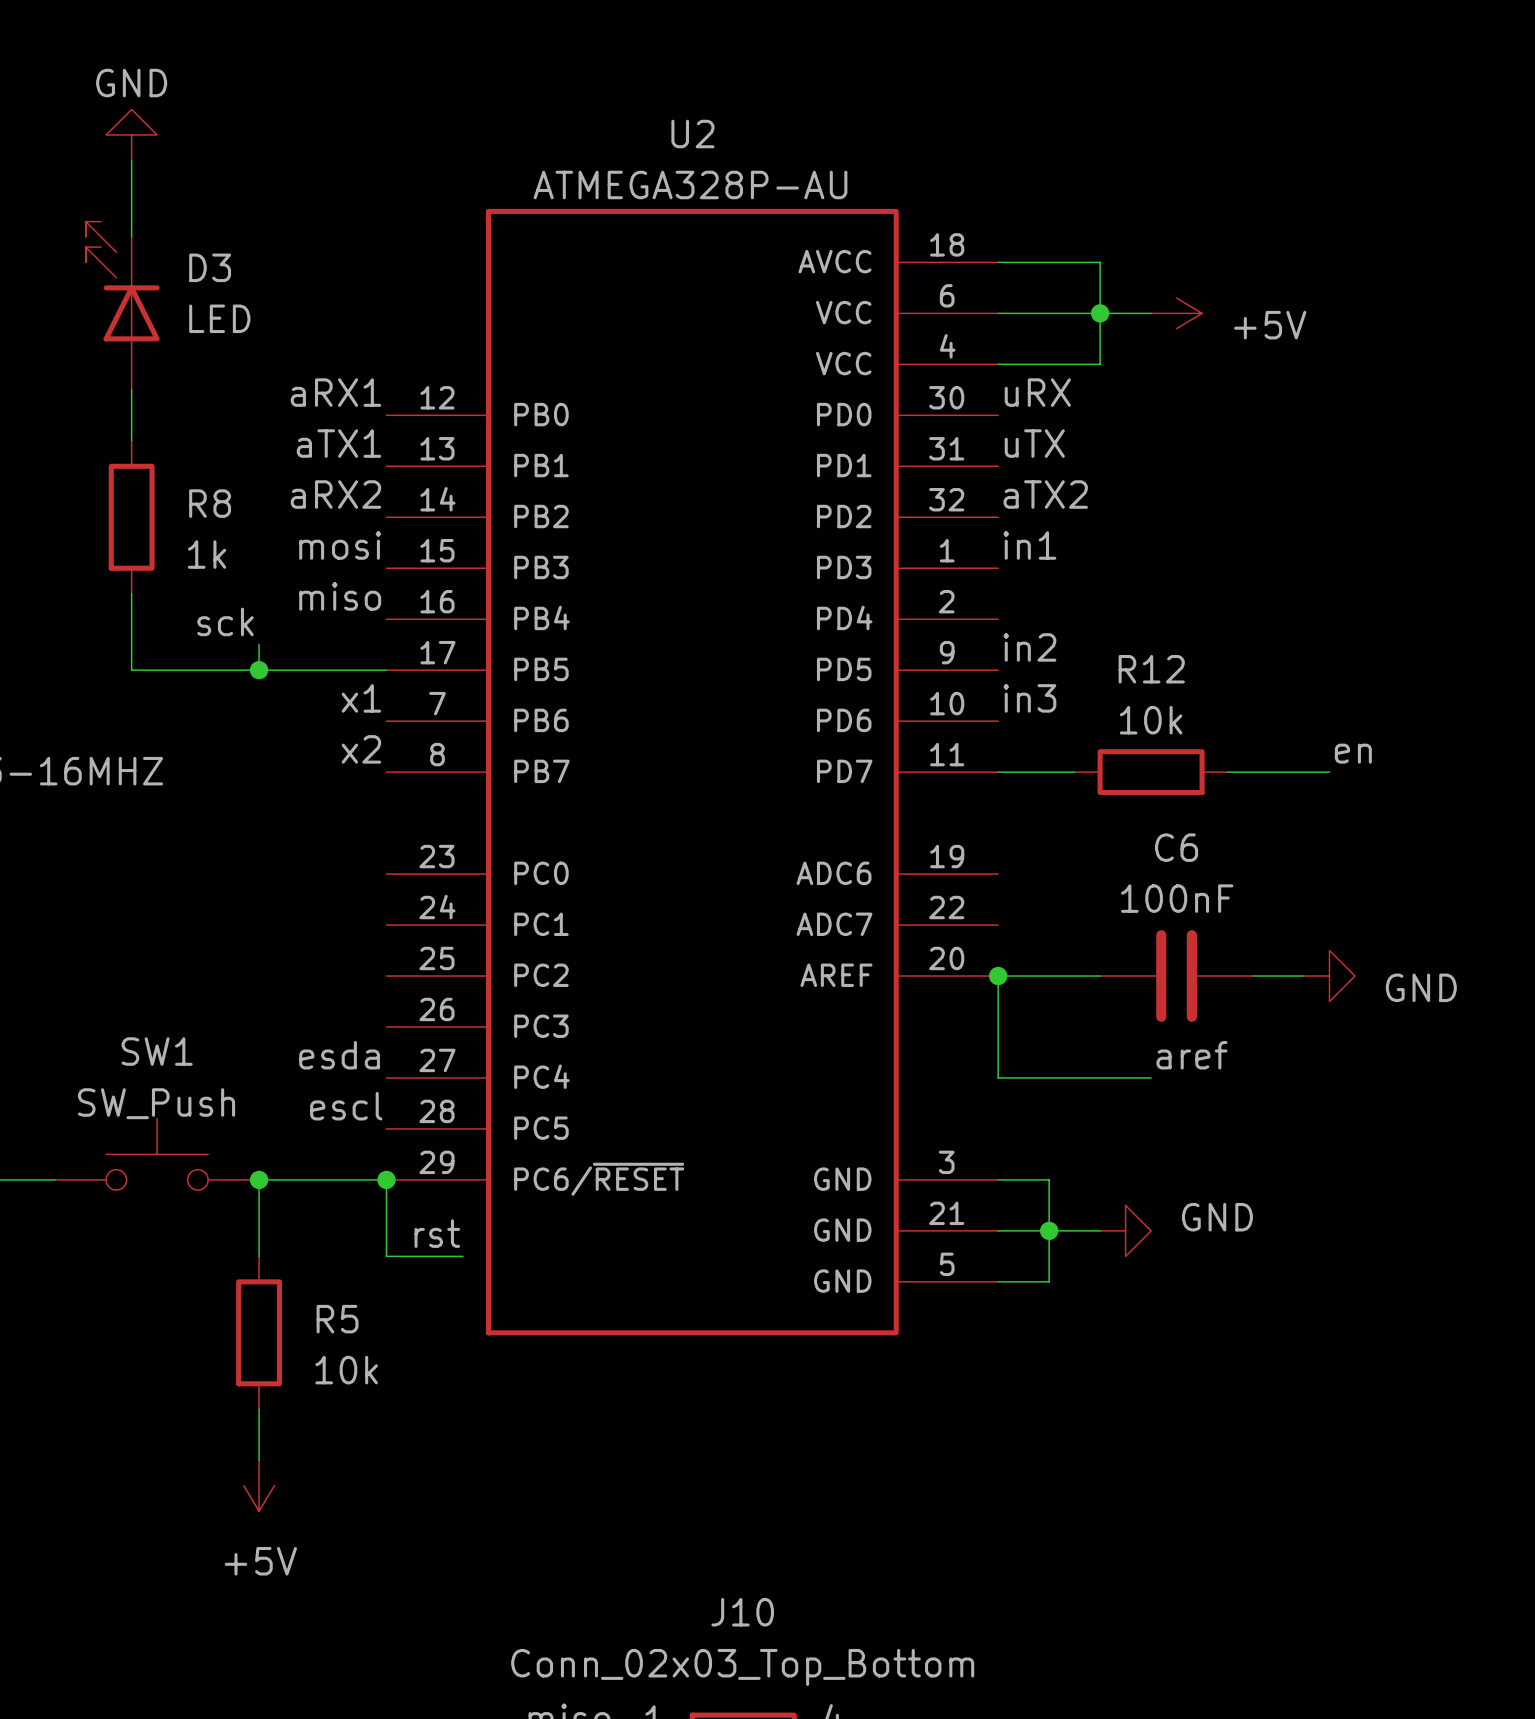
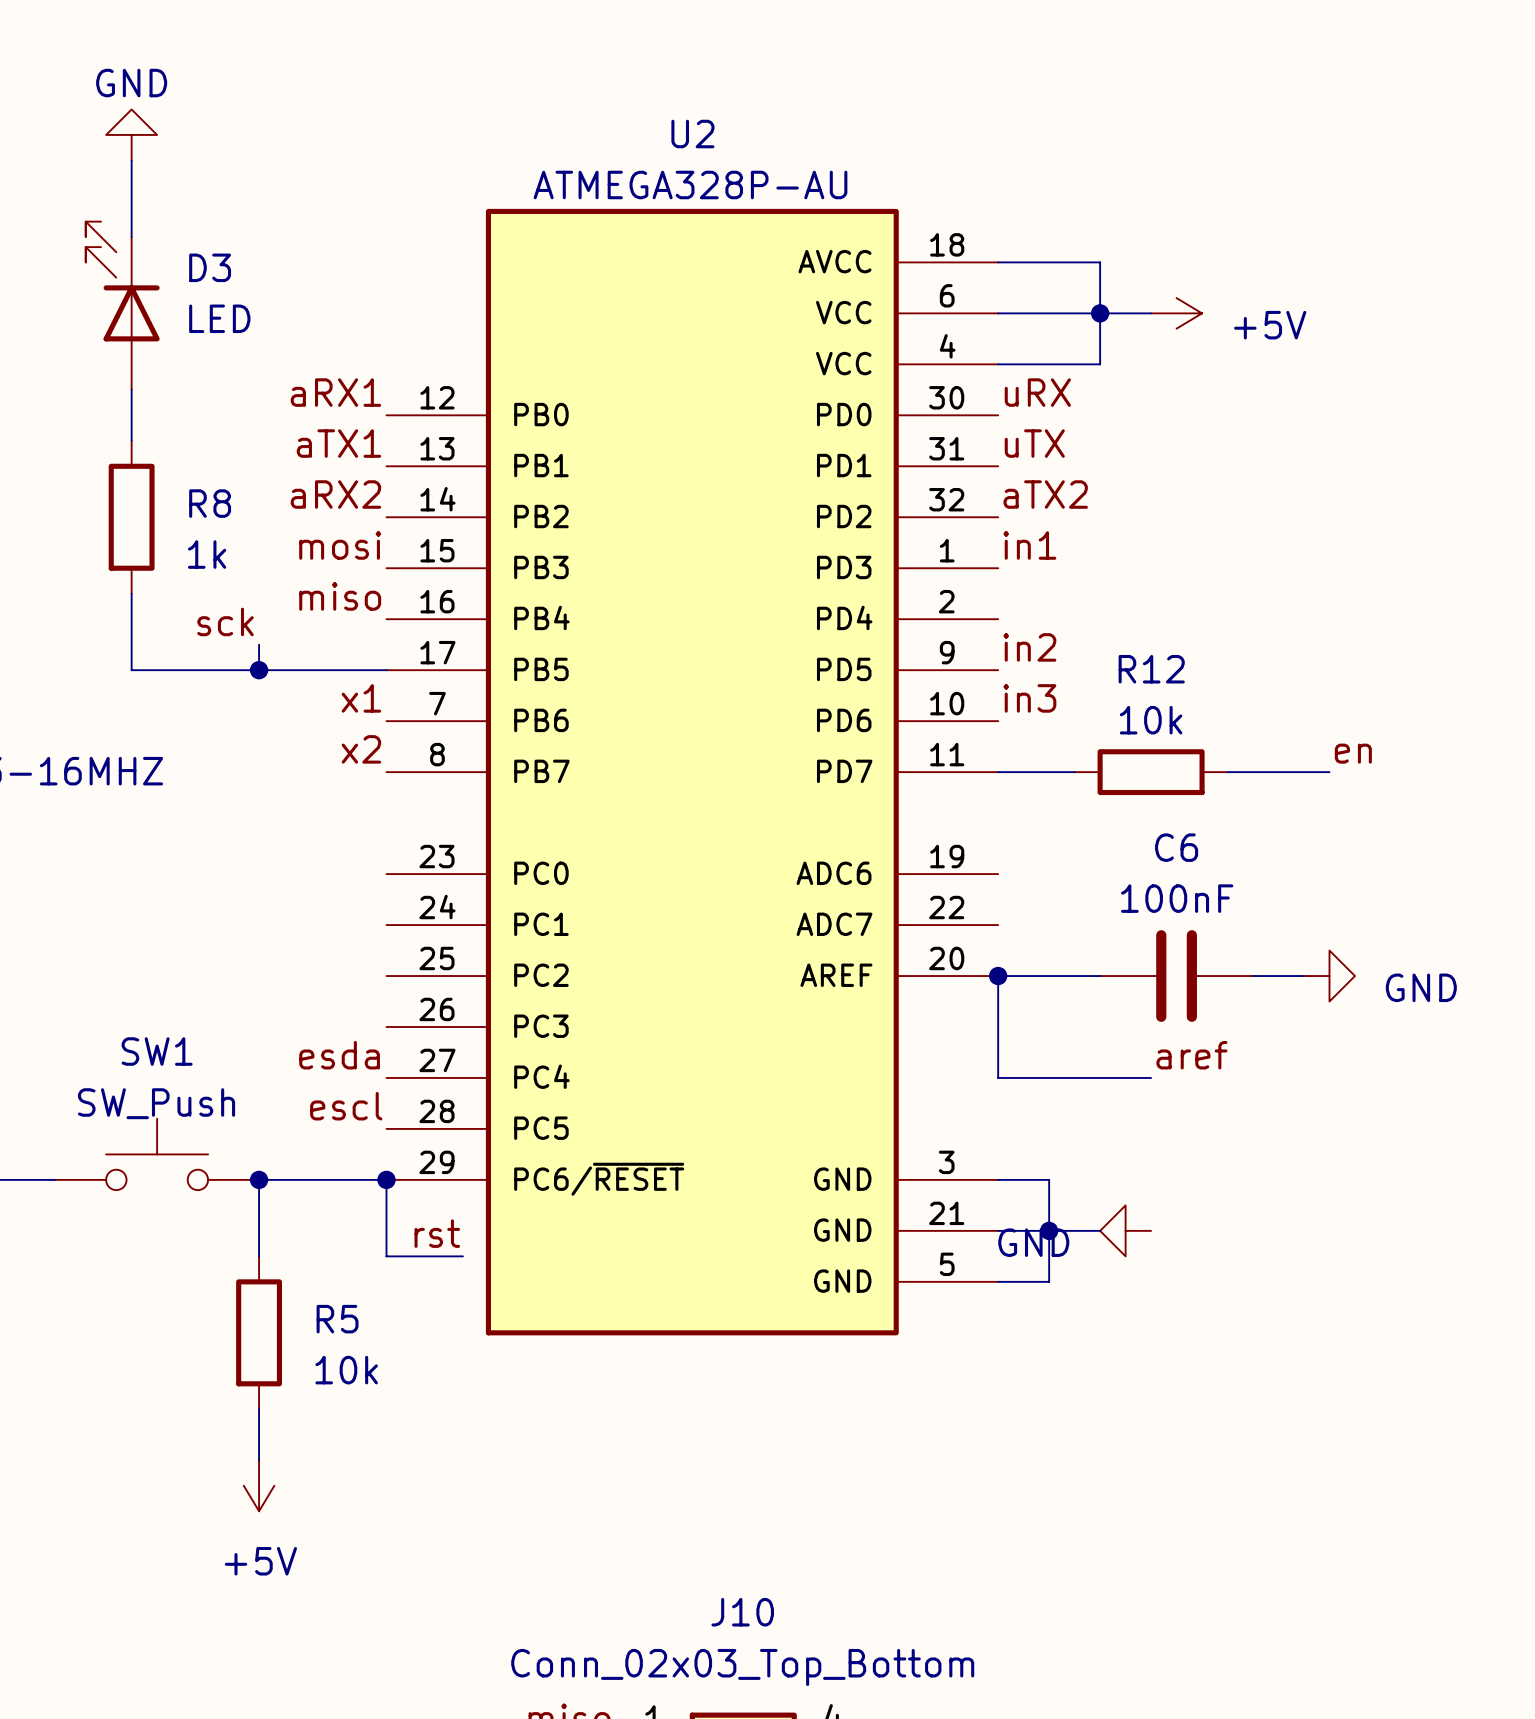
power symbol rotation: 0° (1125, 1230) -> 180° (1125, 1230)

